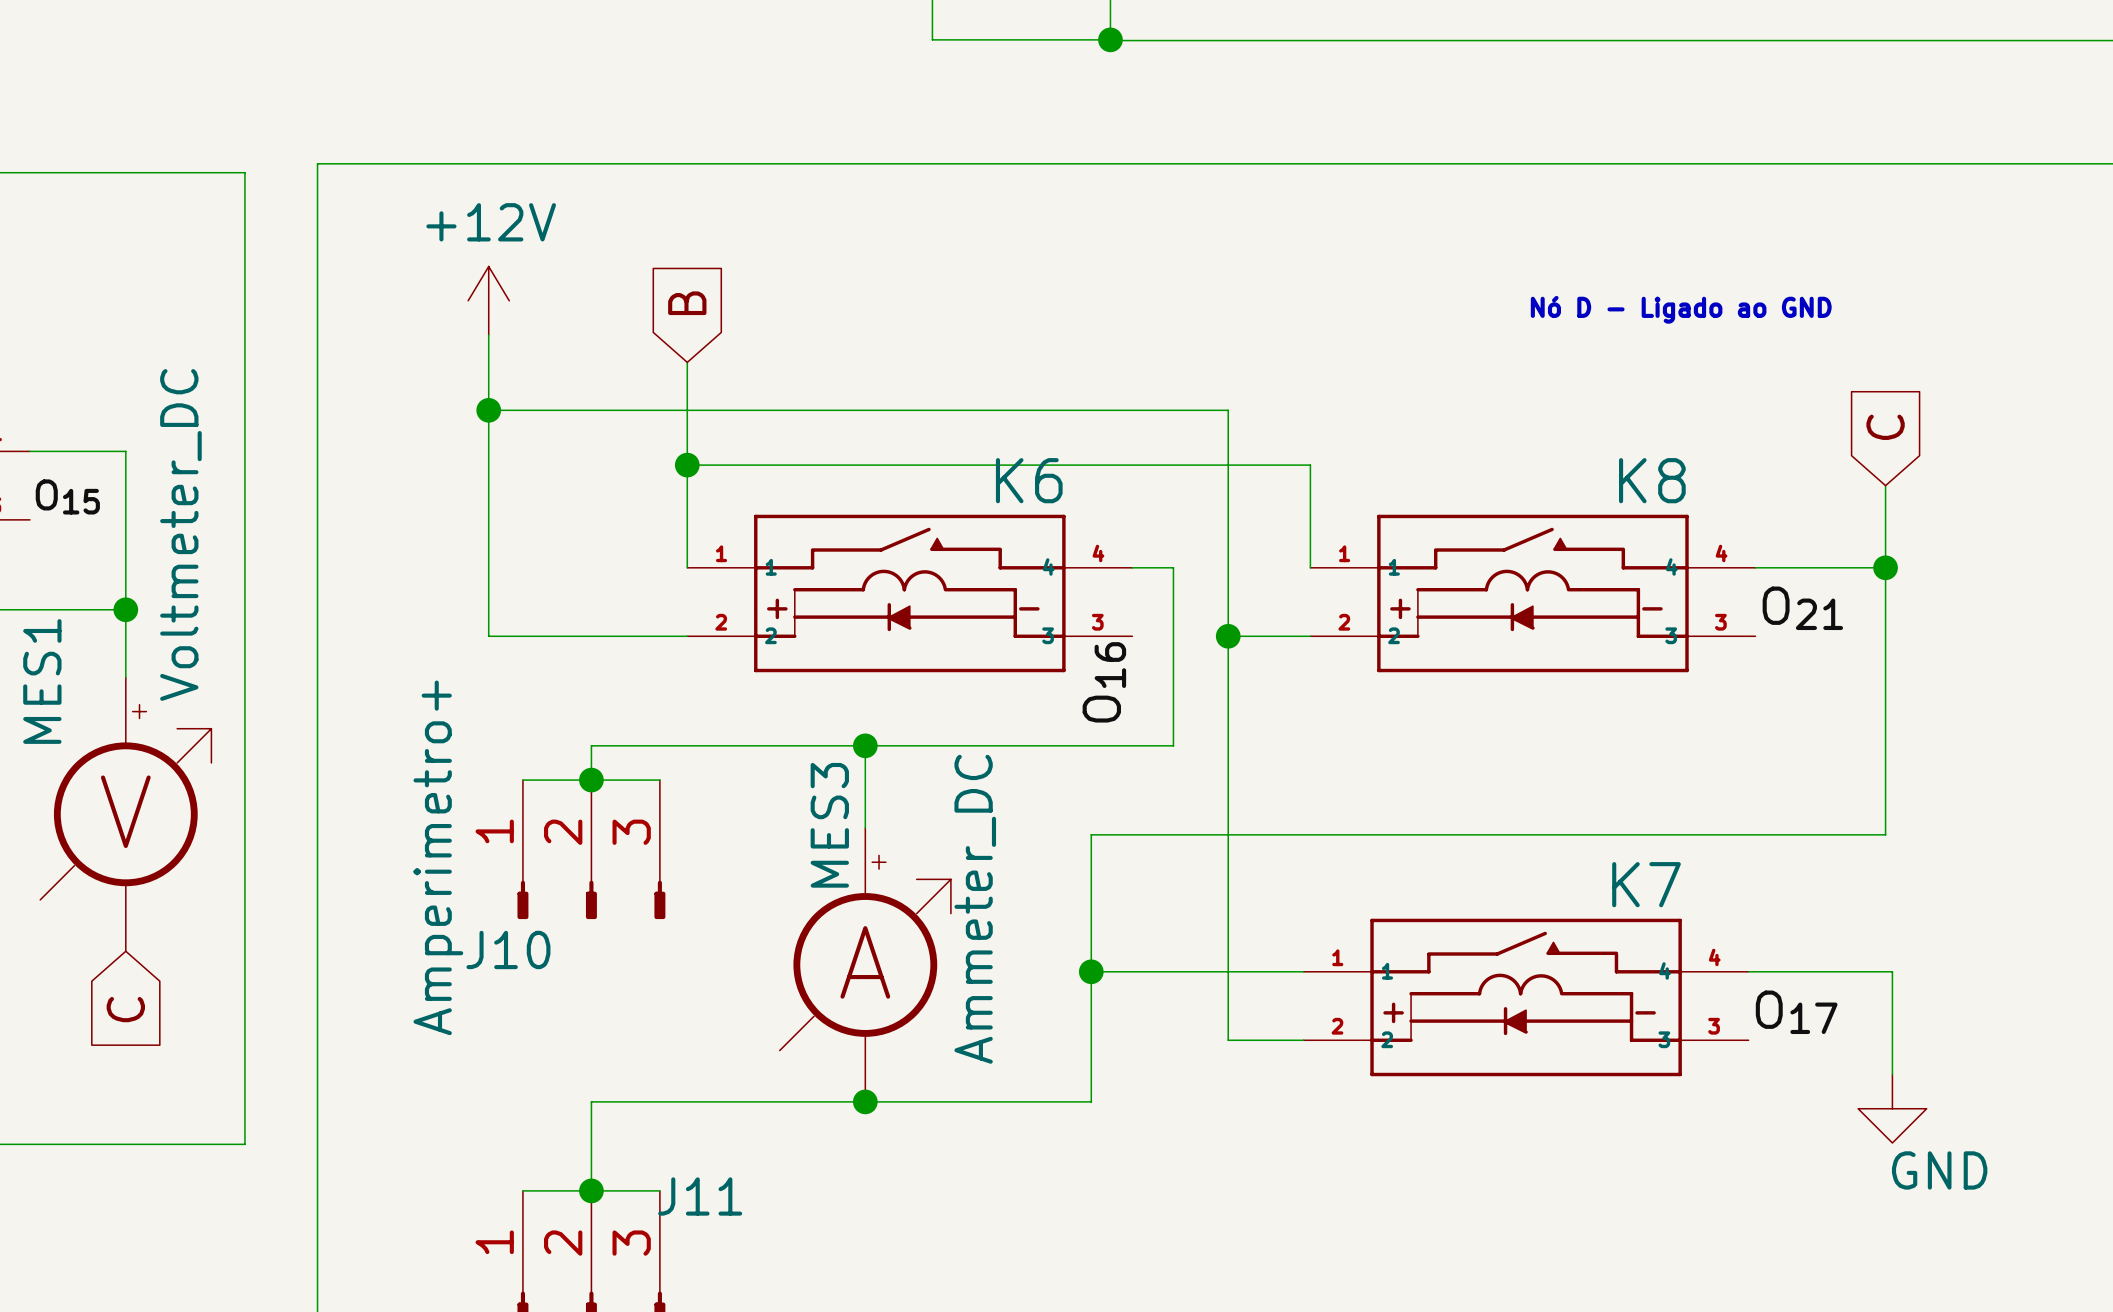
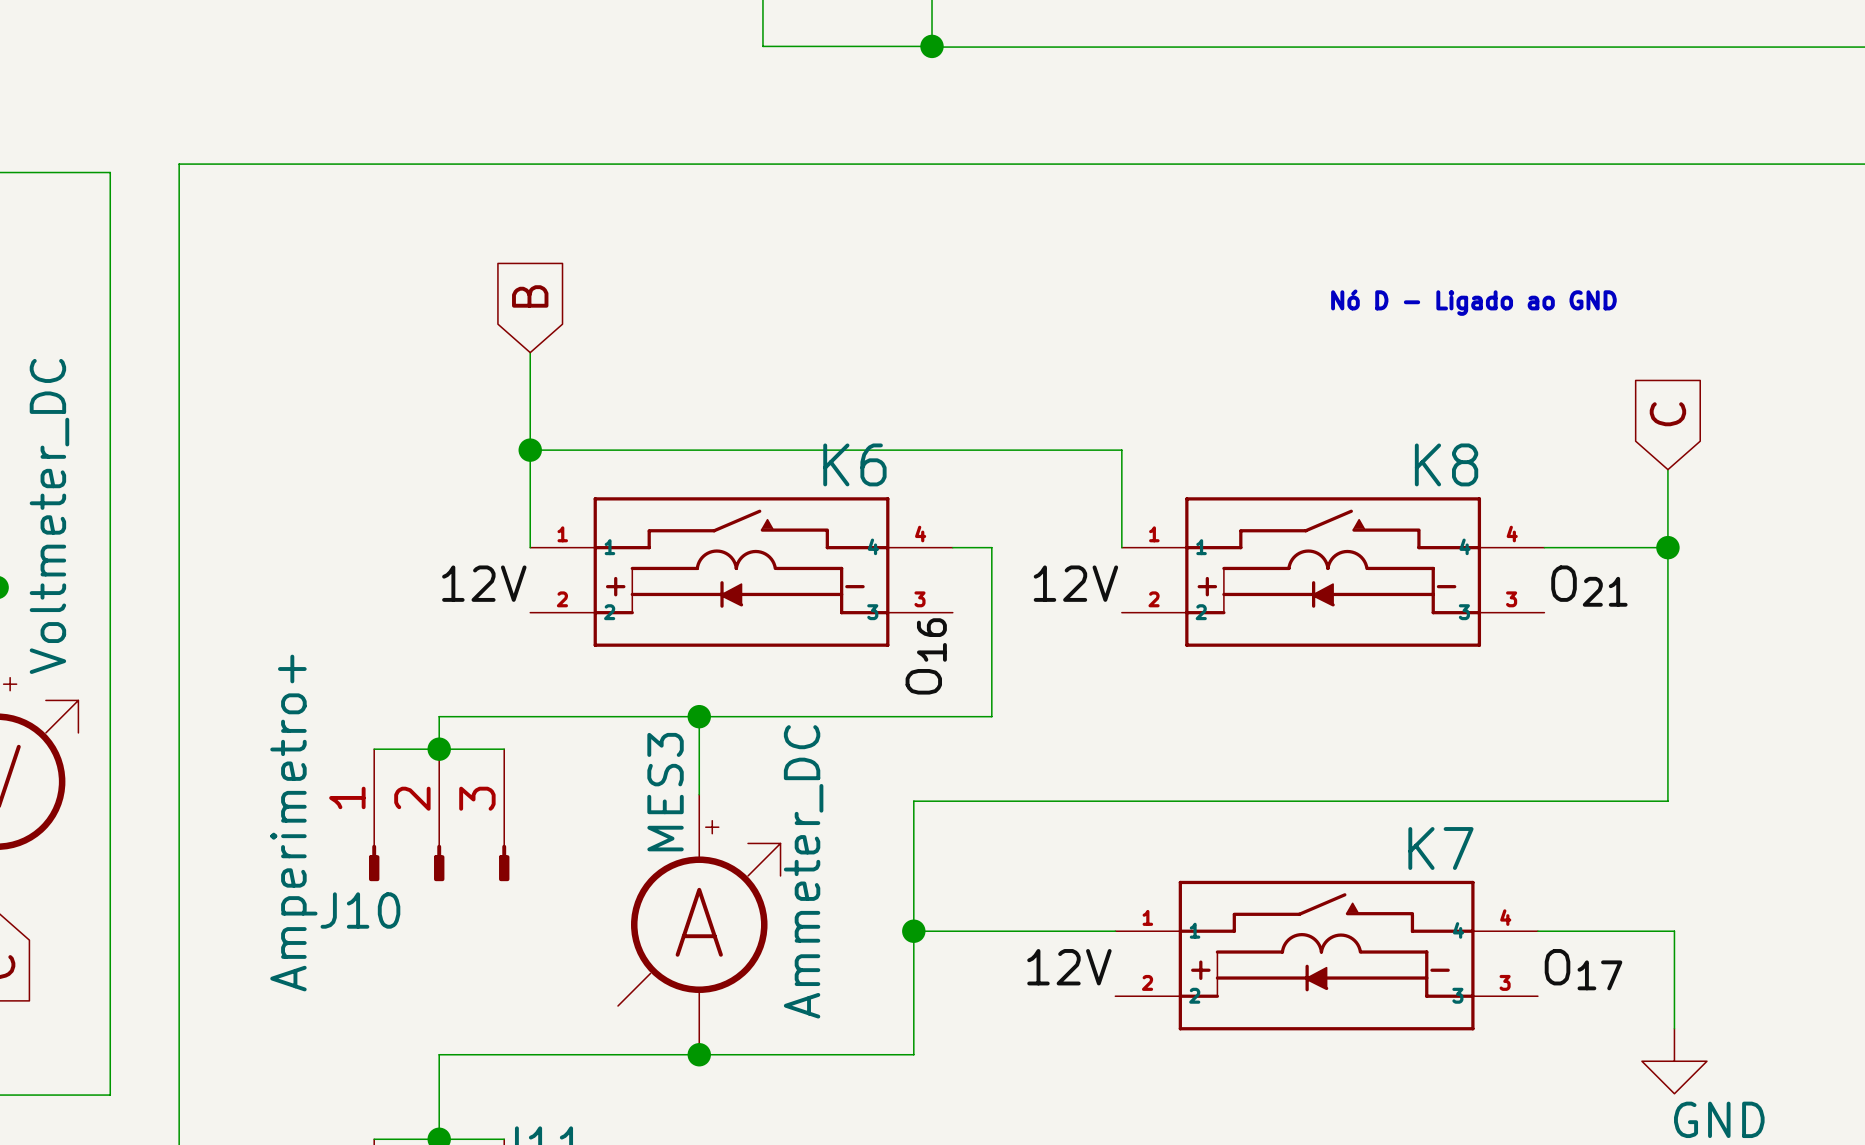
power symbol: +12V (488, 300) -> none
wire: (488, 335) (488, 636) (687, 636) -> none
wire: (488, 410) (1228, 410) (1228, 1040) (1303, 1040) -> none
junction: (488, 410) -> none
label: none -> 12V (484, 583)
label: none -> 12V (1075, 583)
wire: (1228, 636) (1310, 636) -> none
junction: (1228, 636) -> none
label: none -> 12V (1069, 967)

